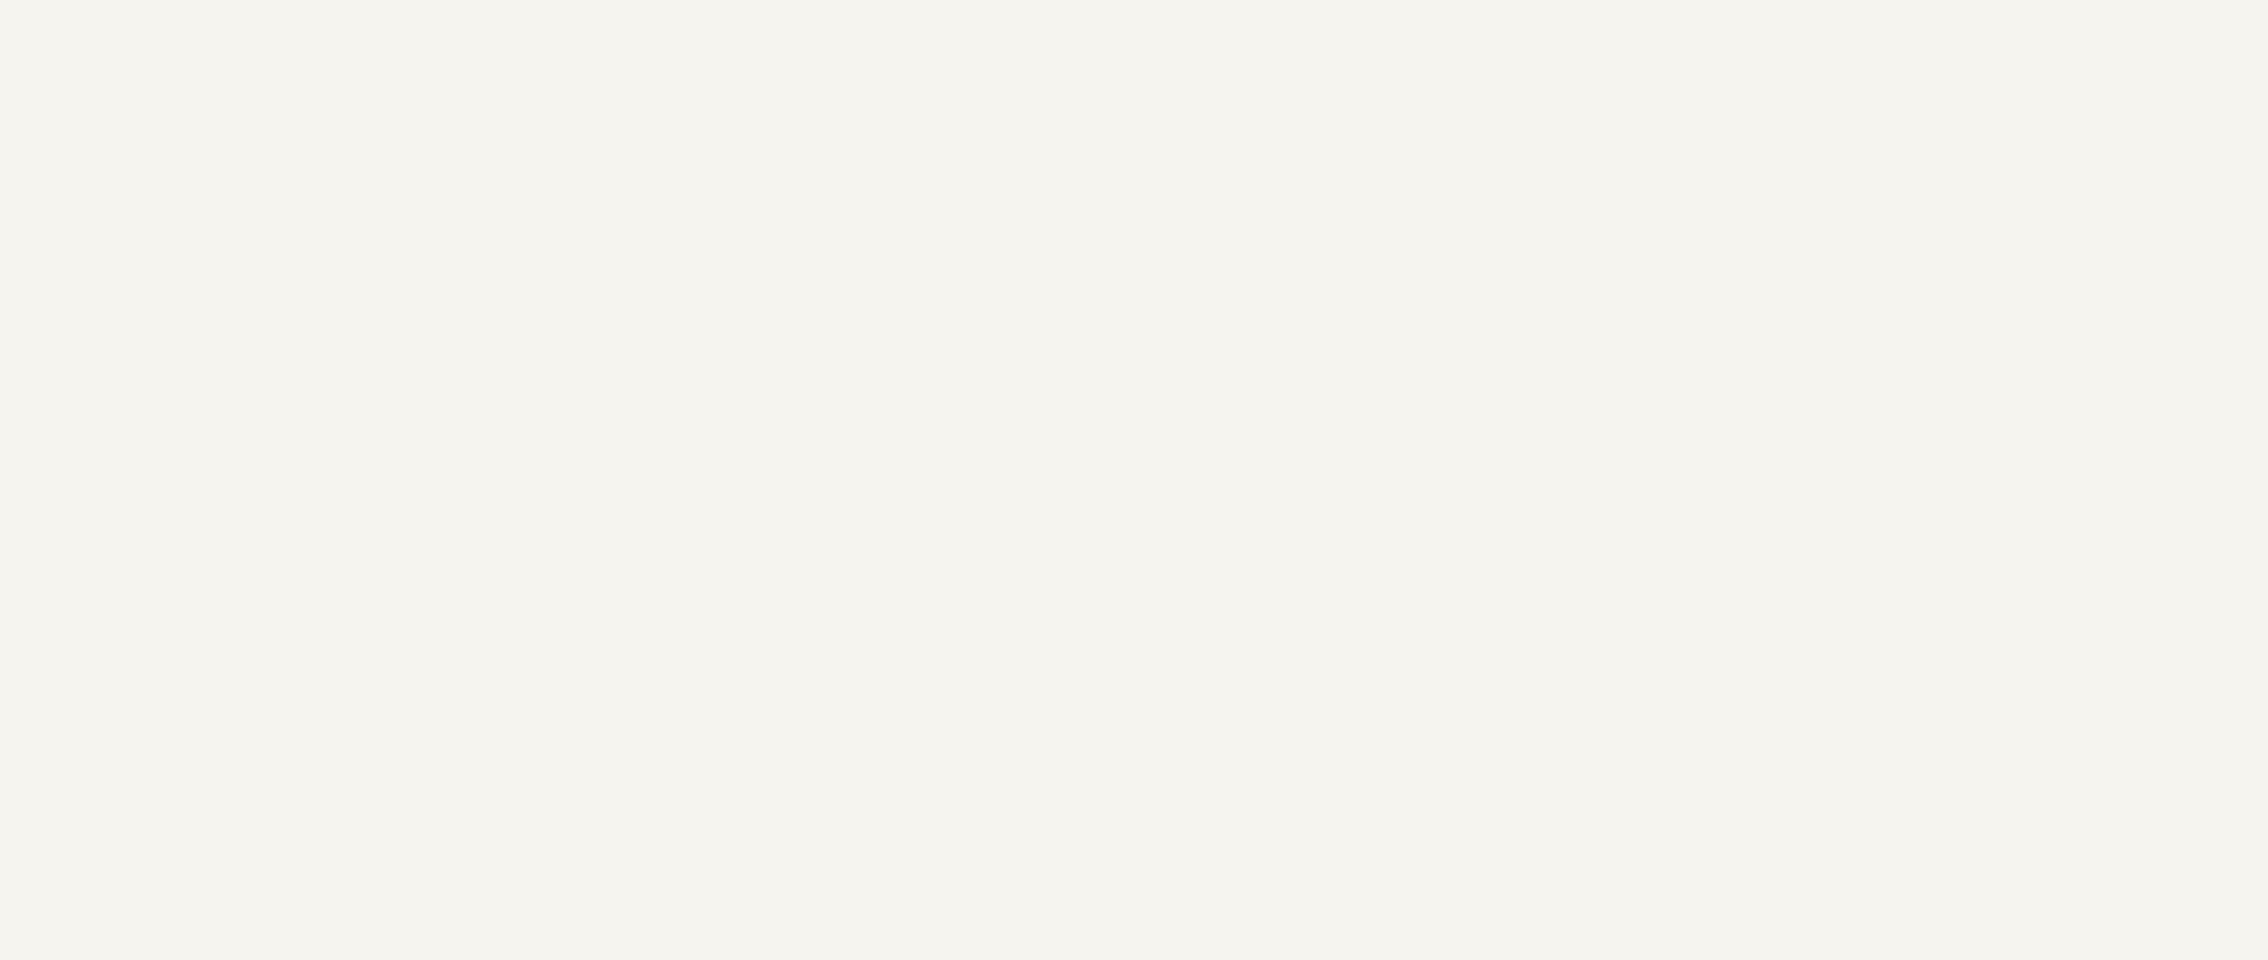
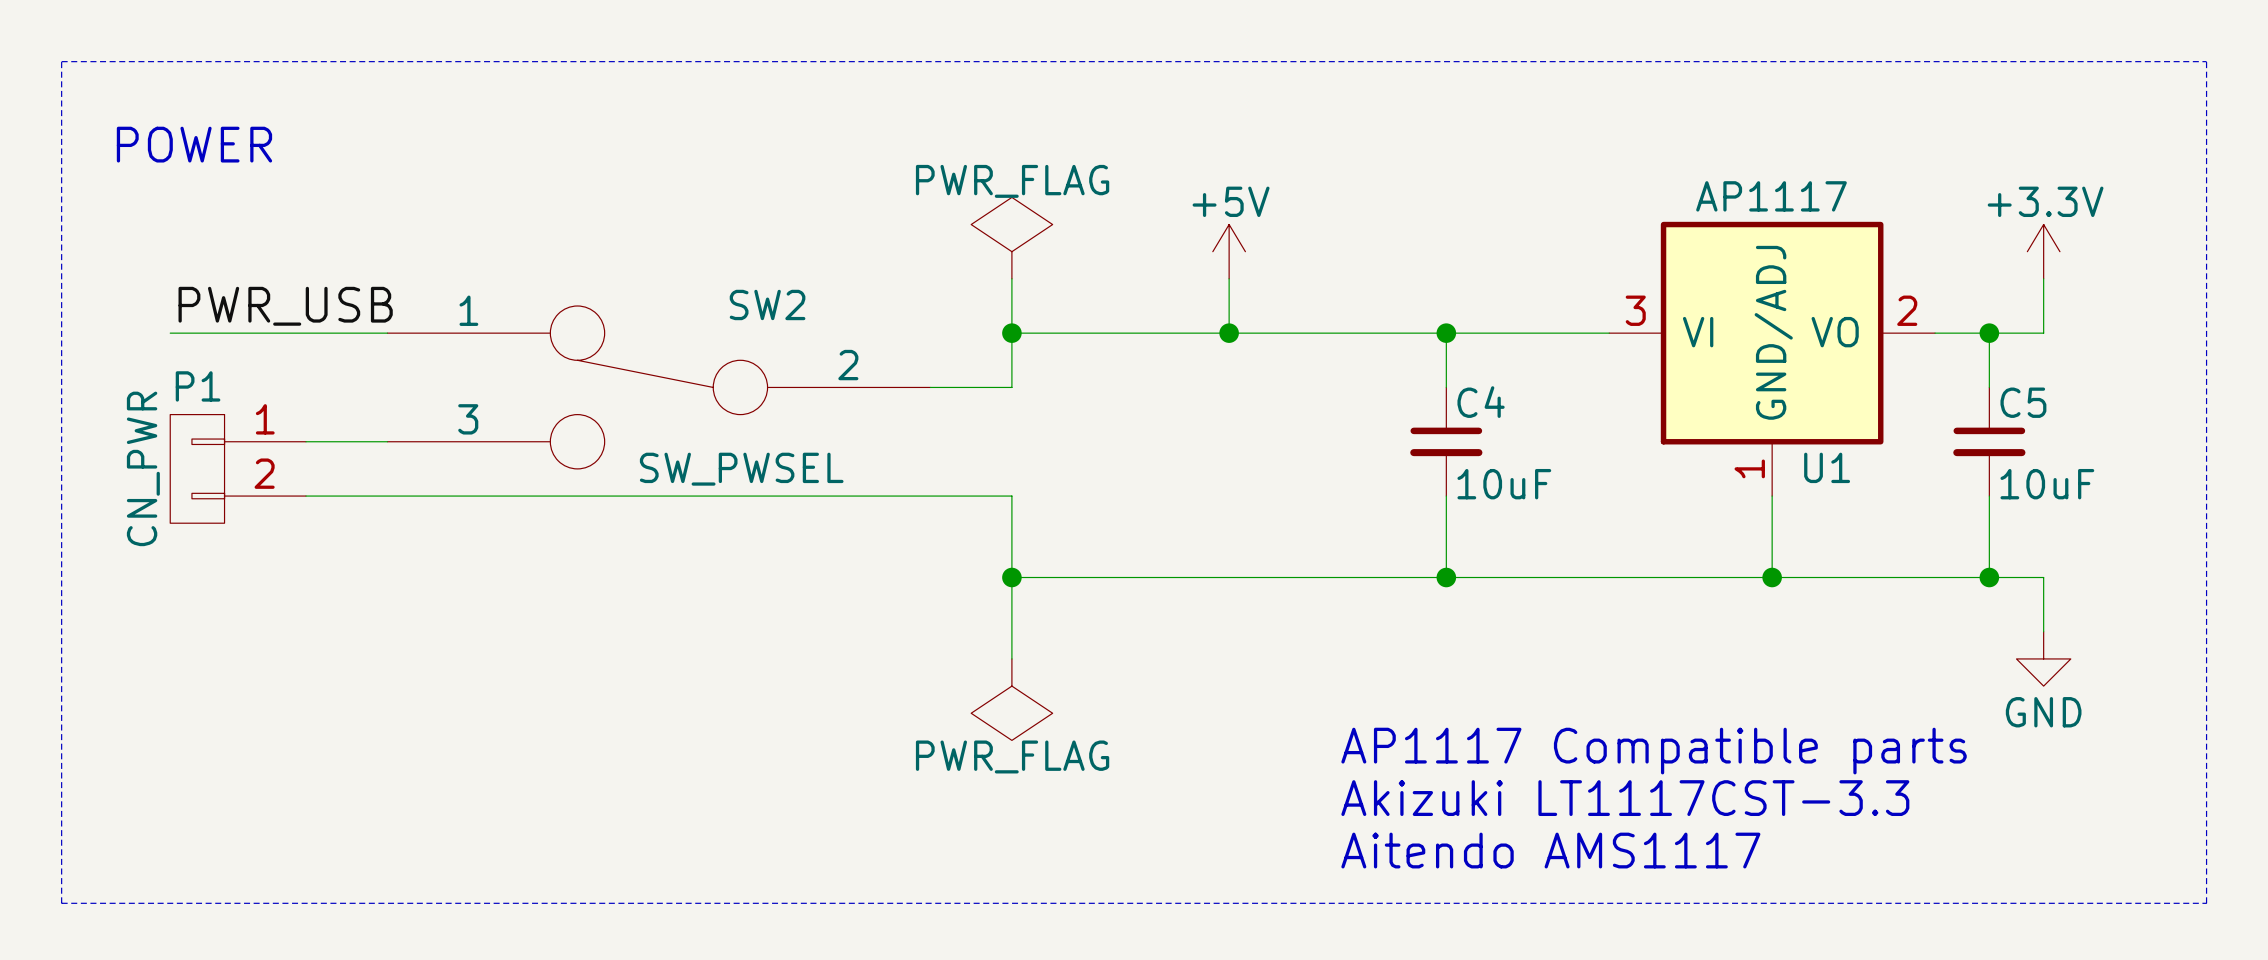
line: none -> (61, 61) (2206, 61) (2206, 903) (61, 903) (61, 61)
text: none -> POWER (194, 144)
power symbol: none -> PWR_FLAG (1011, 238)
power symbol: none -> +5V (1229, 251)
power symbol: none -> +3.3V (2043, 251)
wire: none -> (1011, 278) (1011, 387) (930, 387)
wire: none -> (1229, 278) (1229, 333)
wire: none -> (2043, 278) (2043, 333) (1935, 333)
label: none -> PWR_USB (285, 306)
wire: none -> (170, 333) (387, 333)
wire: none -> (1011, 333) (1609, 333)
junction: none -> (1011, 333)
junction: none -> (1229, 333)
wire: none -> (1446, 333) (1446, 387)
junction: none -> (1446, 333)
wire: none -> (1989, 333) (1989, 387)
junction: none -> (1989, 333)
U1: none -> AP1117 (1772, 358)
SW2: none -> SW_PWSEL (658, 387)
wire: none -> (305, 441) (387, 441)
C4: none -> 10uF (1446, 441)
C5: none -> 10uF (1989, 441)
P1: none -> CN_PWR (238, 468)
wire: none -> (305, 496) (1011, 496) (1011, 658)
wire: none -> (1446, 496) (1446, 577)
wire: none -> (1772, 496) (1772, 577)
wire: none -> (1989, 496) (1989, 577)
wire: none -> (1011, 577) (2043, 577) (2043, 631)
junction: none -> (1011, 577)
junction: none -> (1446, 577)
junction: none -> (1772, 577)
junction: none -> (1989, 577)
power symbol: none -> GND (2043, 658)
power symbol: none -> PWR_FLAG (1011, 699)
text: none -> AP1117 Compatible parts (1654, 751)
text: none -> Akizuki LT1117CST-3.3 (1625, 798)
text: none -> Aitendo AMS1117 (1550, 850)

